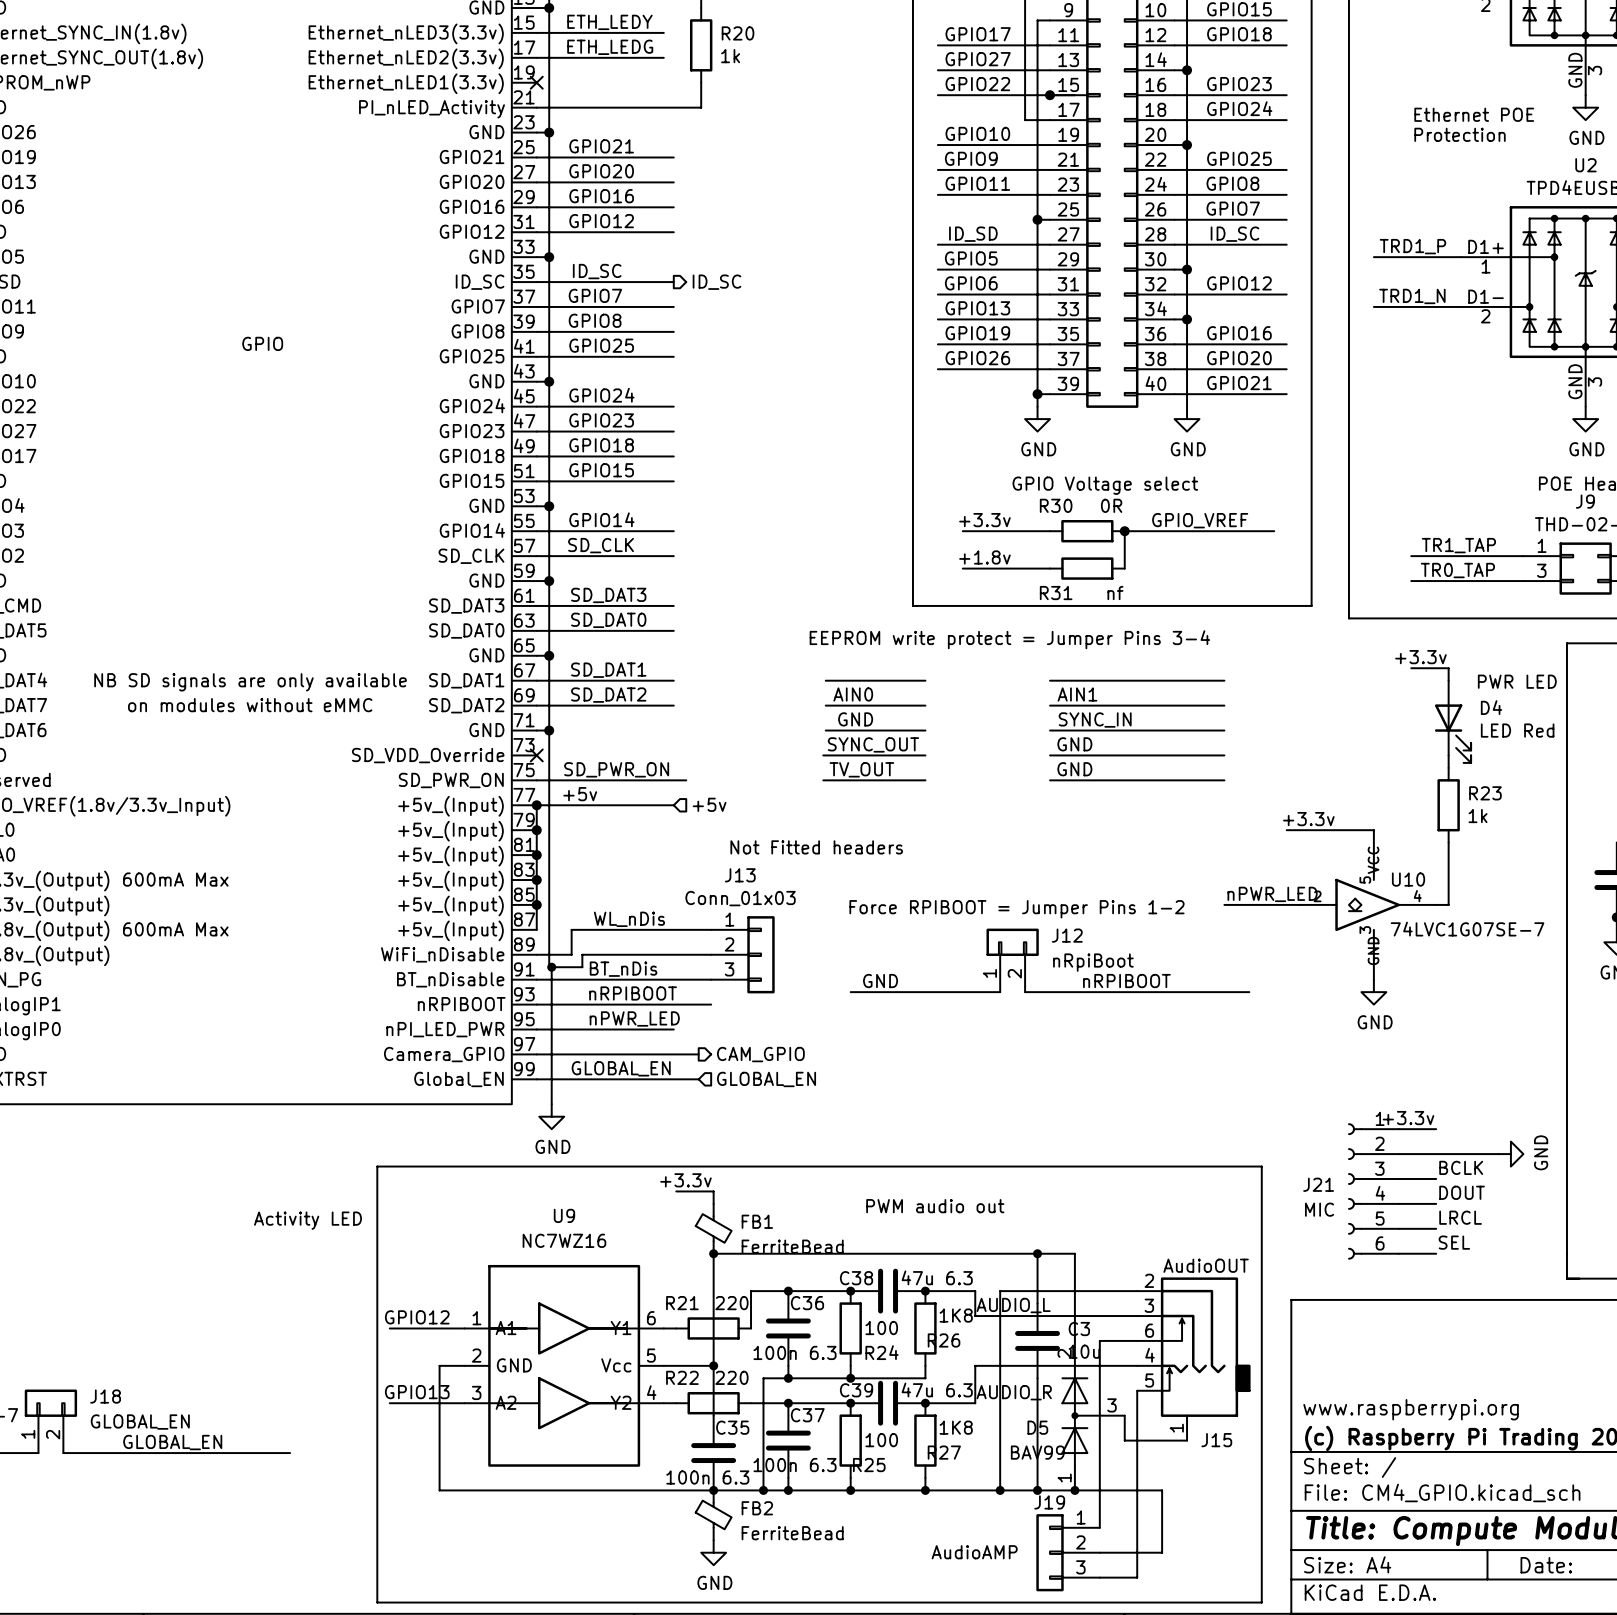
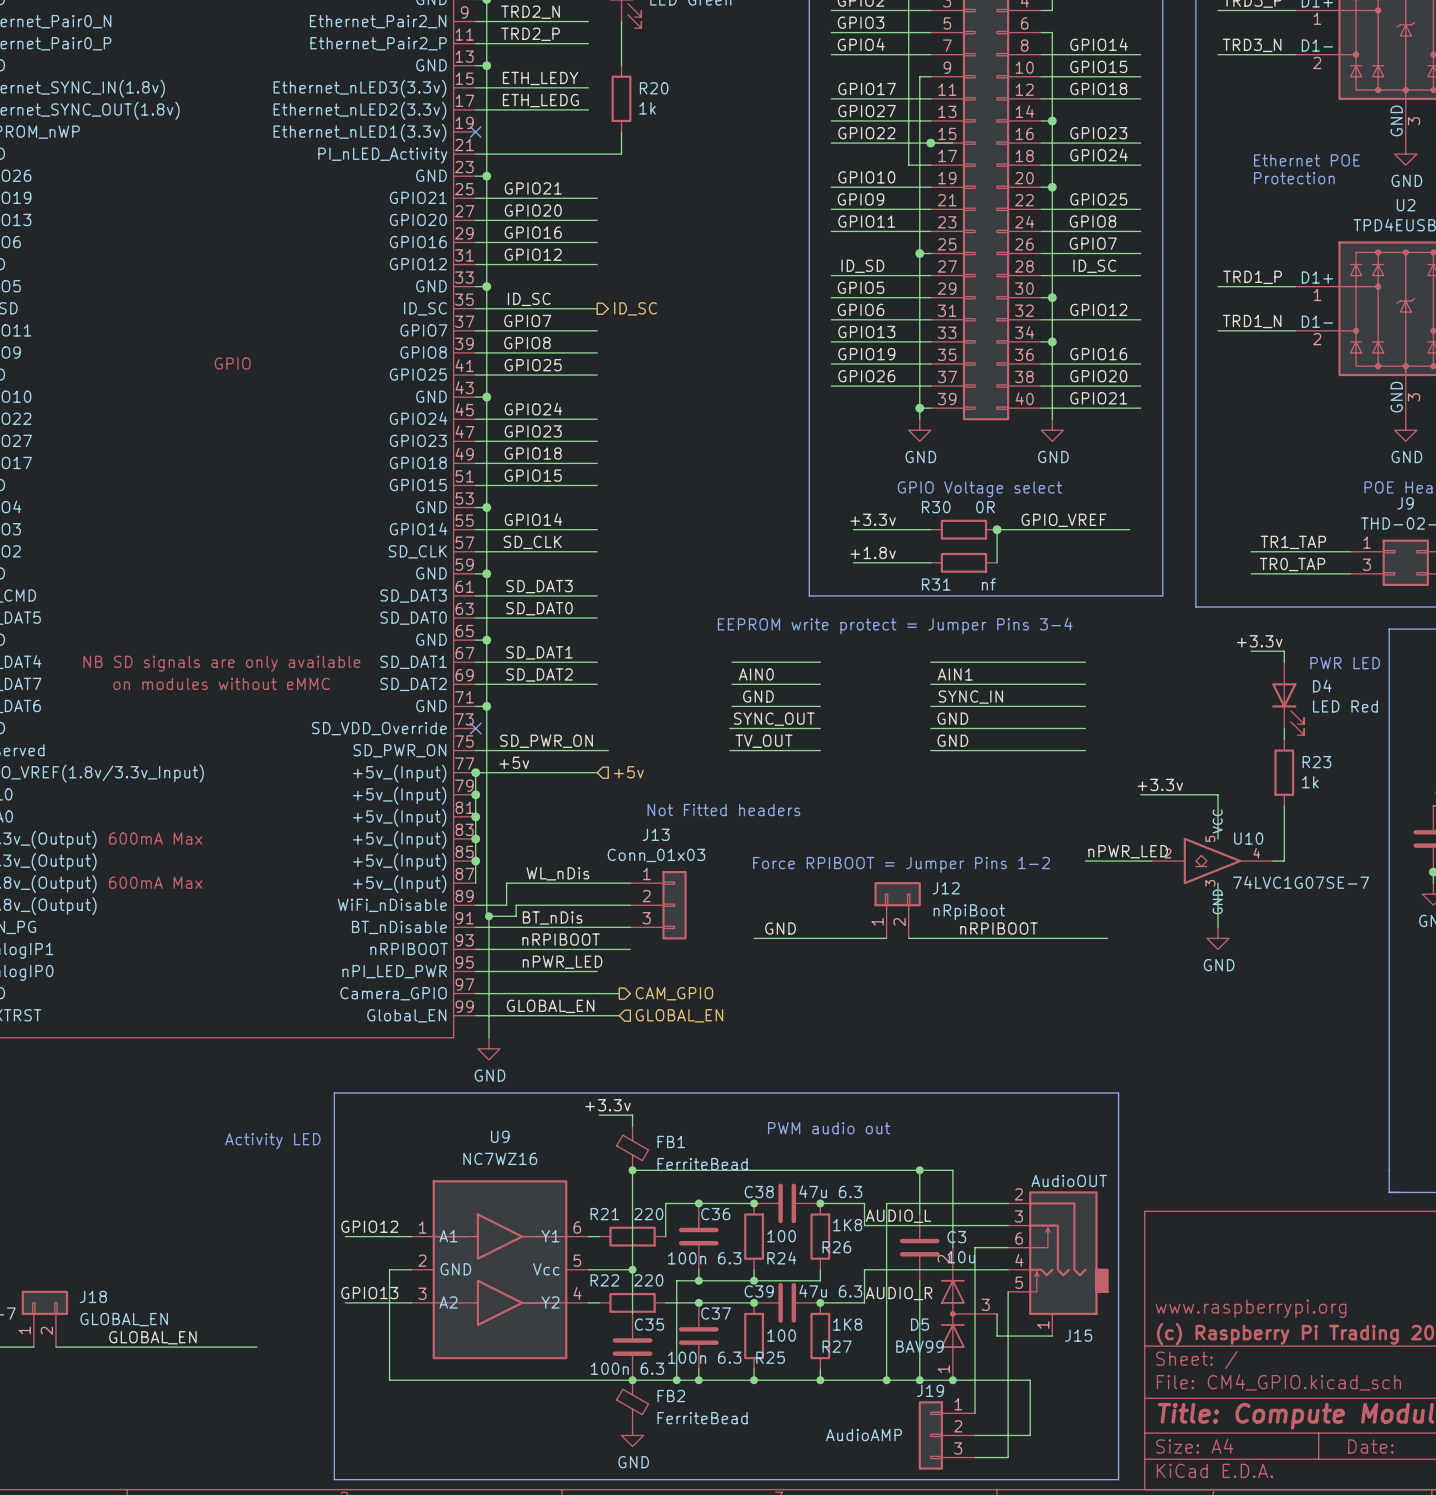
label: +3.3v (1408, 1118) -> none
wire: (1398, 1129) (1436, 1129) -> none
wire: (1398, 1154) (1498, 1154) -> none
power symbol: GND (1510, 1154) -> none
label: BCLK (1461, 1167) -> none
wire: (1398, 1178) (1436, 1178) -> none
J21: MIC (1373, 1191) -> none
label: DOUT (1462, 1192) -> none
wire: (1398, 1203) (1436, 1203) -> none
label: LRCL (1460, 1217) -> none
wire: (1398, 1228) (1436, 1228) -> none
label: SEL (1454, 1242) -> none
wire: (1398, 1253) (1436, 1253) -> none

